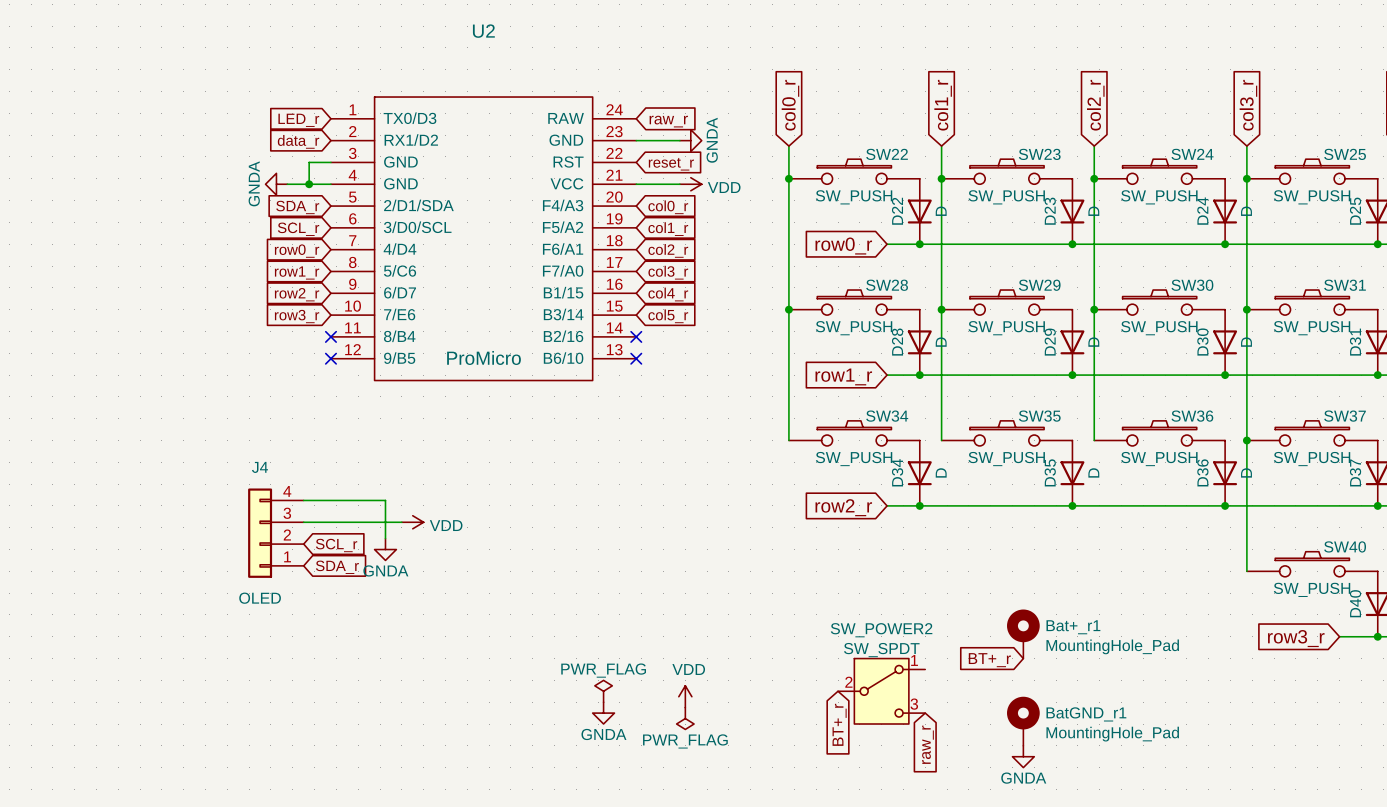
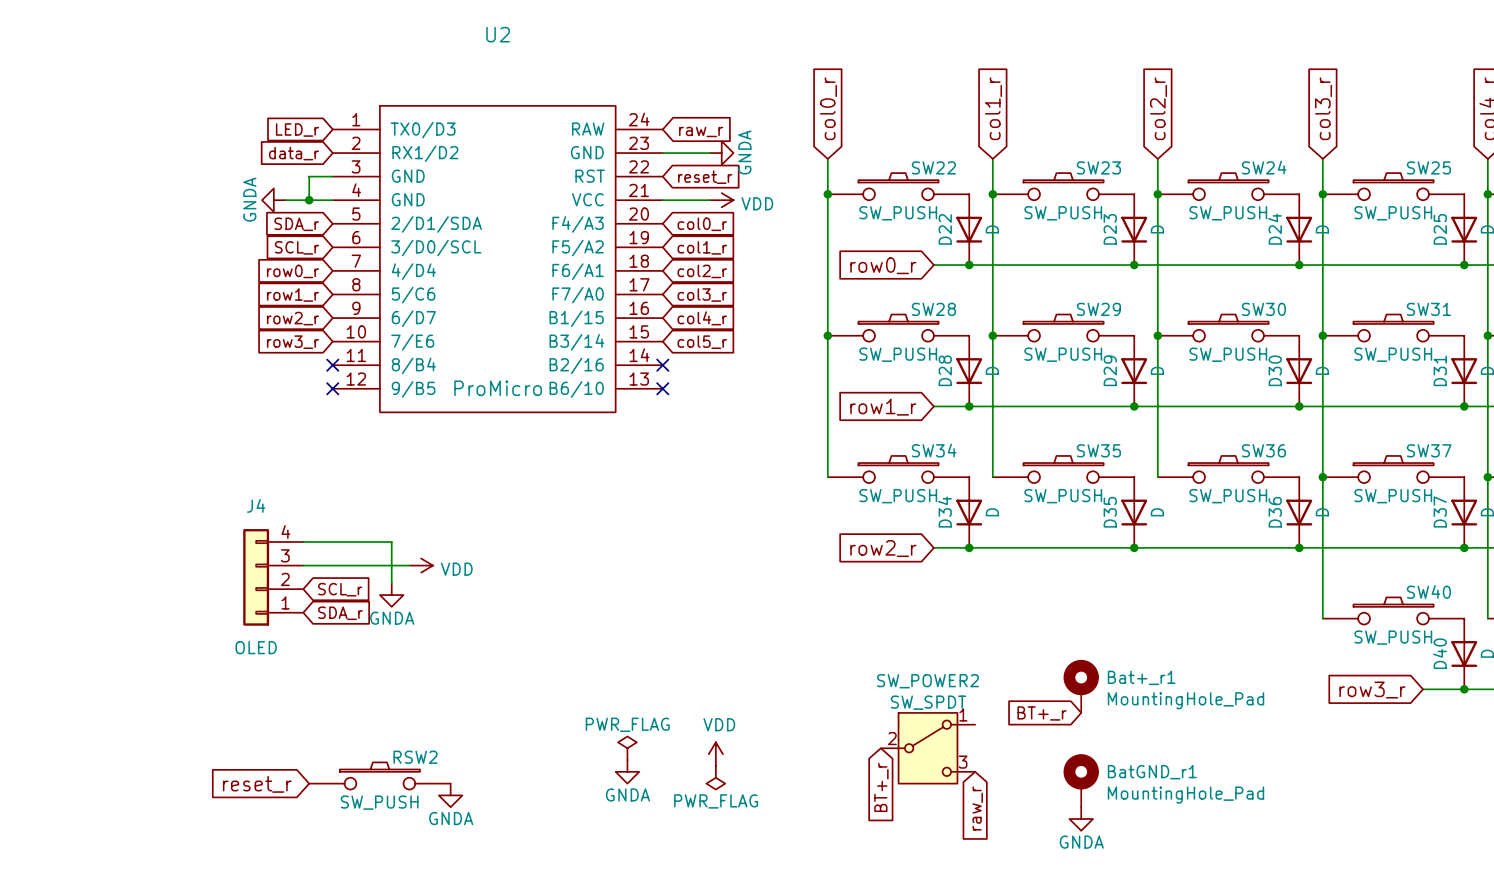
RSW2: none -> SW_PUSH (379, 775)
global label: none -> reset_r (257, 784)
power symbol: none -> GNDA (450, 795)

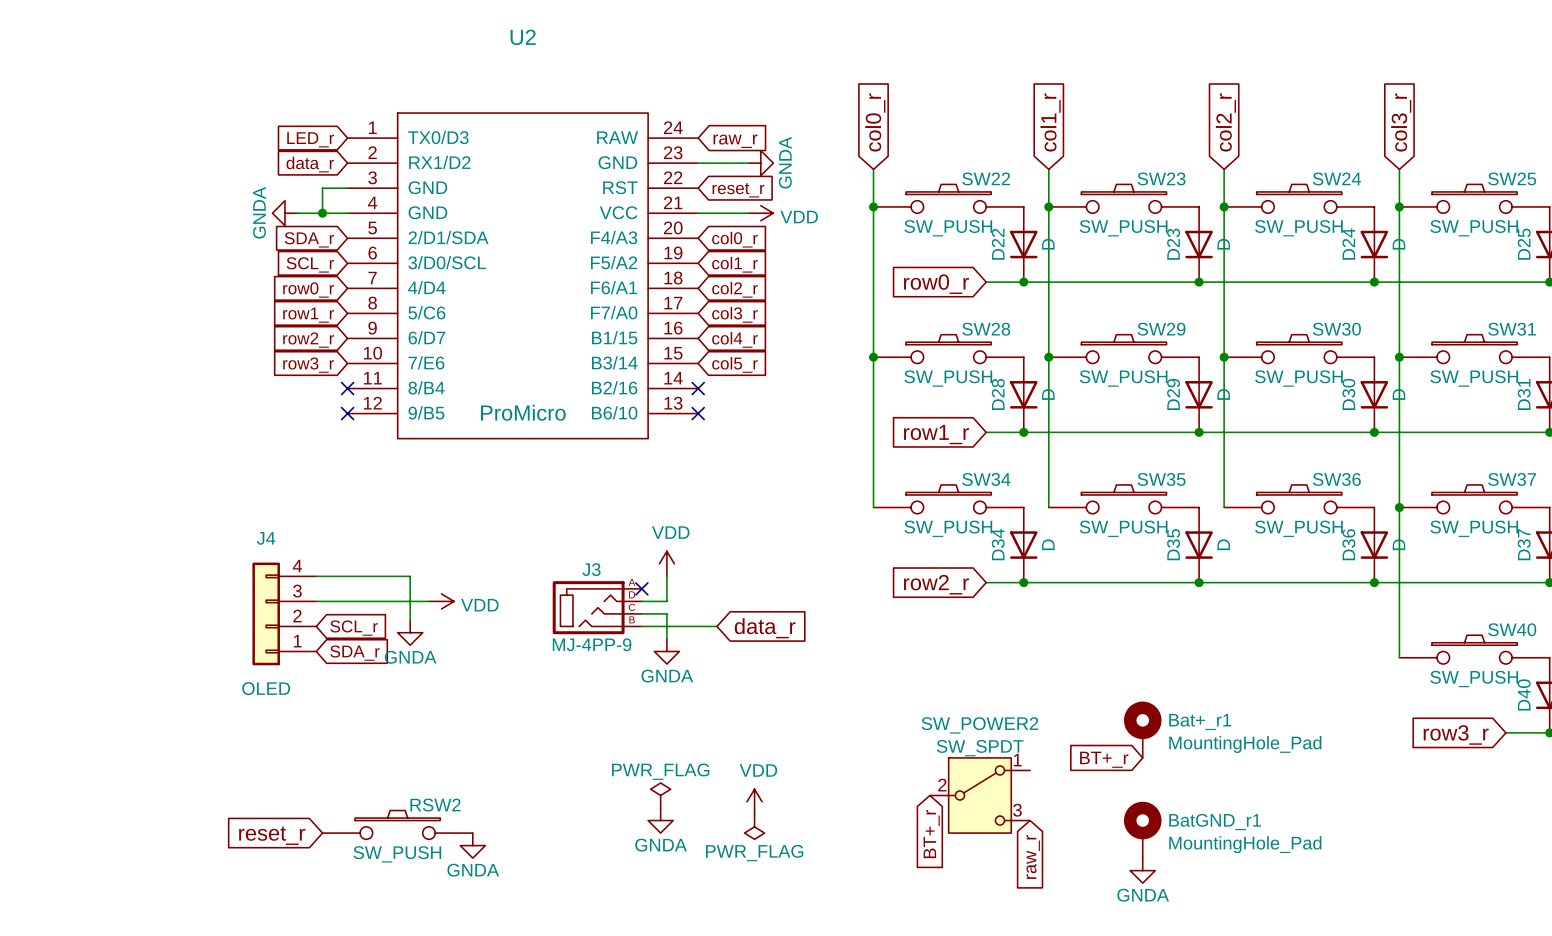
power symbol: none -> VDD (666, 563)
wire: none -> (666, 576) (666, 601) (641, 601)
no-connect mark: none -> (641, 588)
J3: none -> MJ-4PP-9 (597, 607)
wire: none -> (641, 613) (666, 613) (666, 638)
wire: none -> (641, 626) (716, 626)
global label: none -> data_r (765, 628)
power symbol: none -> GNDA (666, 651)

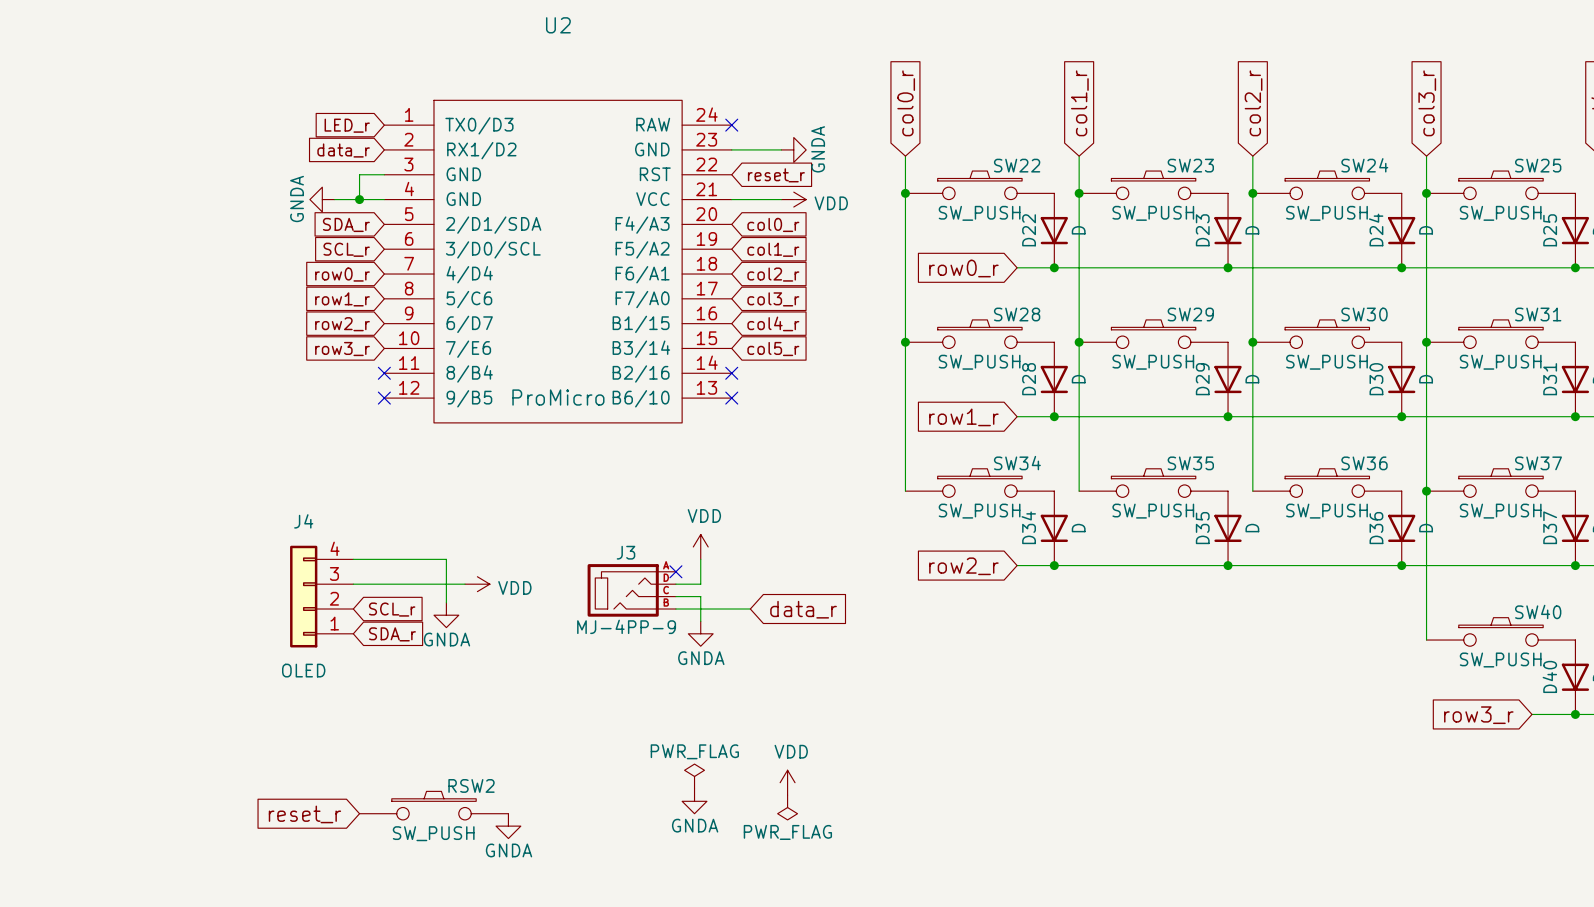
no-connect mark: none -> (731, 125)
global label: raw_r (735, 141) -> none
Bat+_r1: MountingHole_Pad (1142, 729) -> none
global label: BT+_r (1104, 759) -> none
SW_POWER2: SW_SPDT (979, 795) -> none
BatGND_r1: MountingHole_Pad (1142, 829) -> none
global label: BT+_r (931, 834) -> none
global label: raw_r (1033, 856) -> none
power symbol: GNDA (1142, 870) -> none

